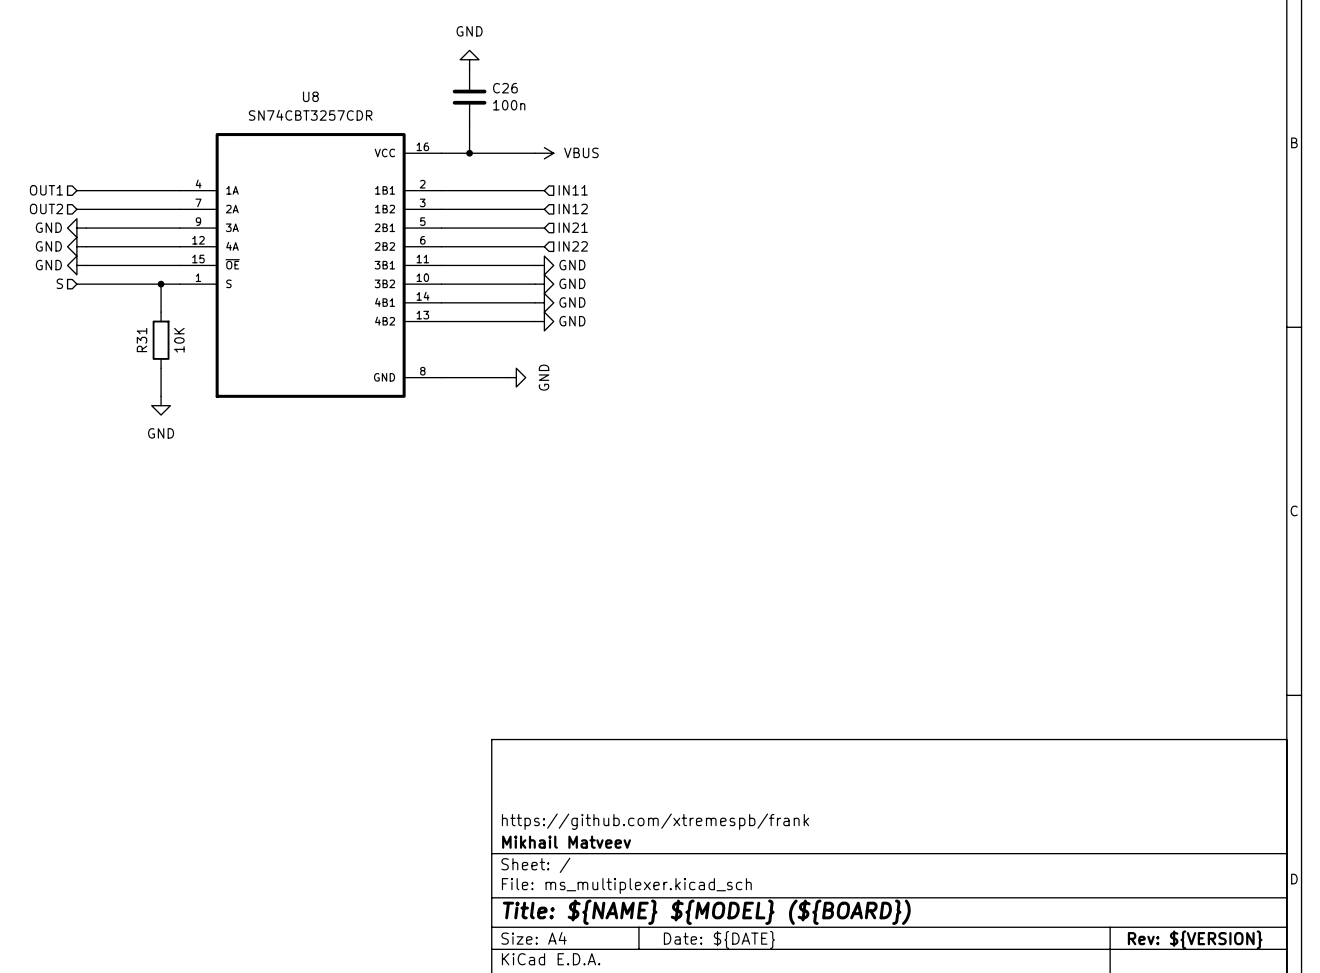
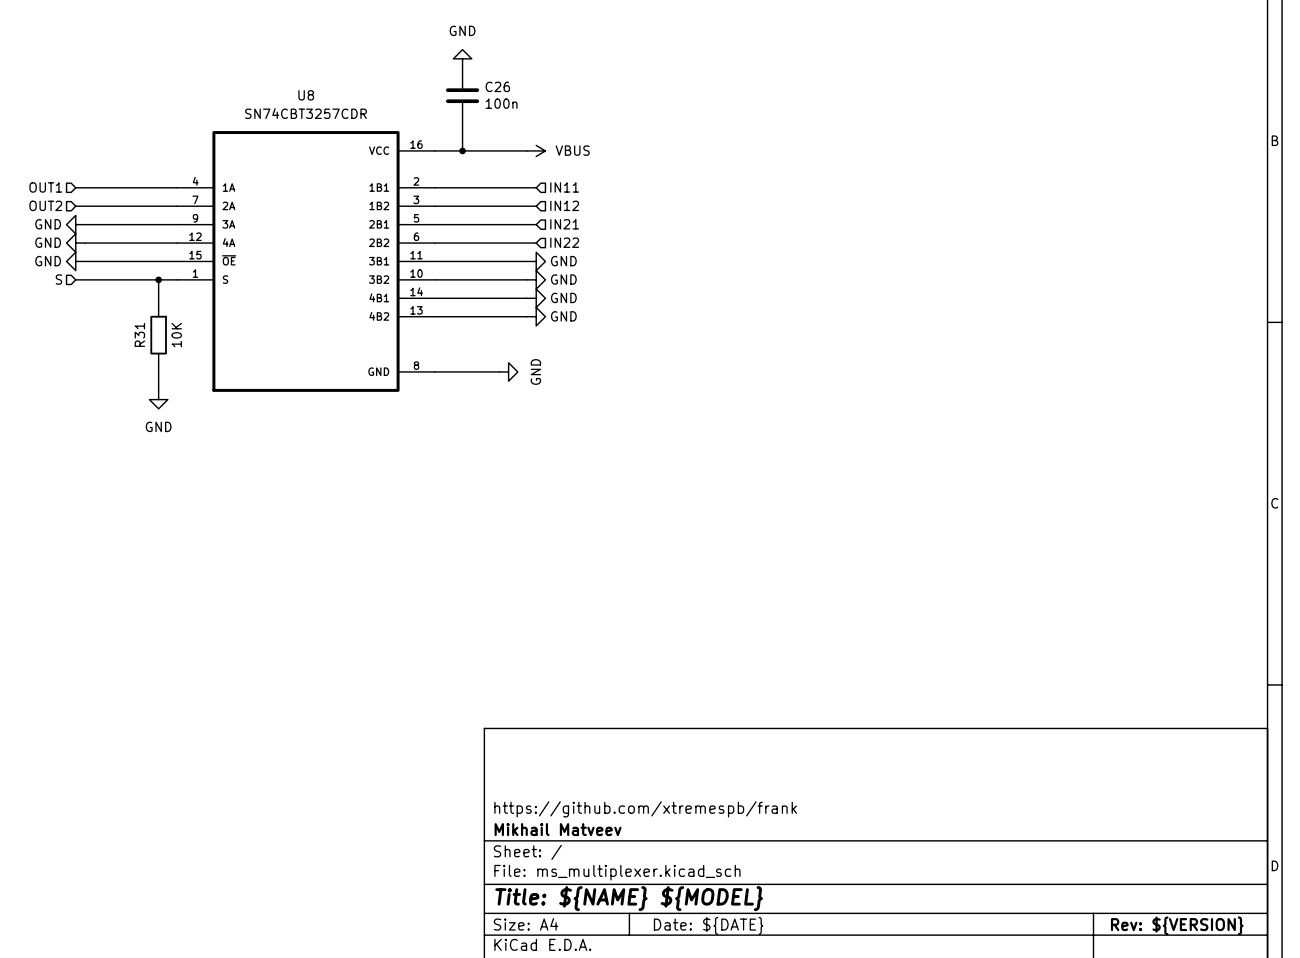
title block: Title: ${NAME} ${MODEL} (${BOARD}) (706, 912) -> Title: ${NAME} ${MODEL} (629, 898)

